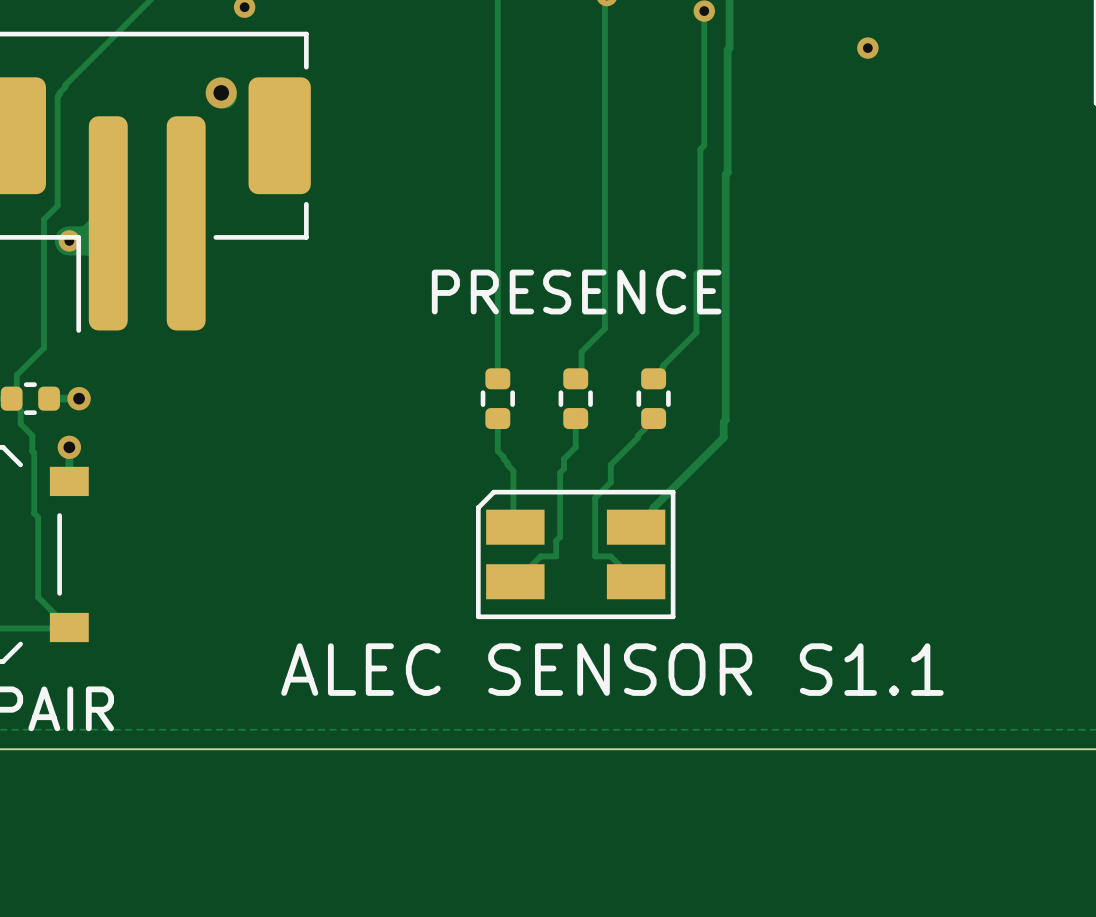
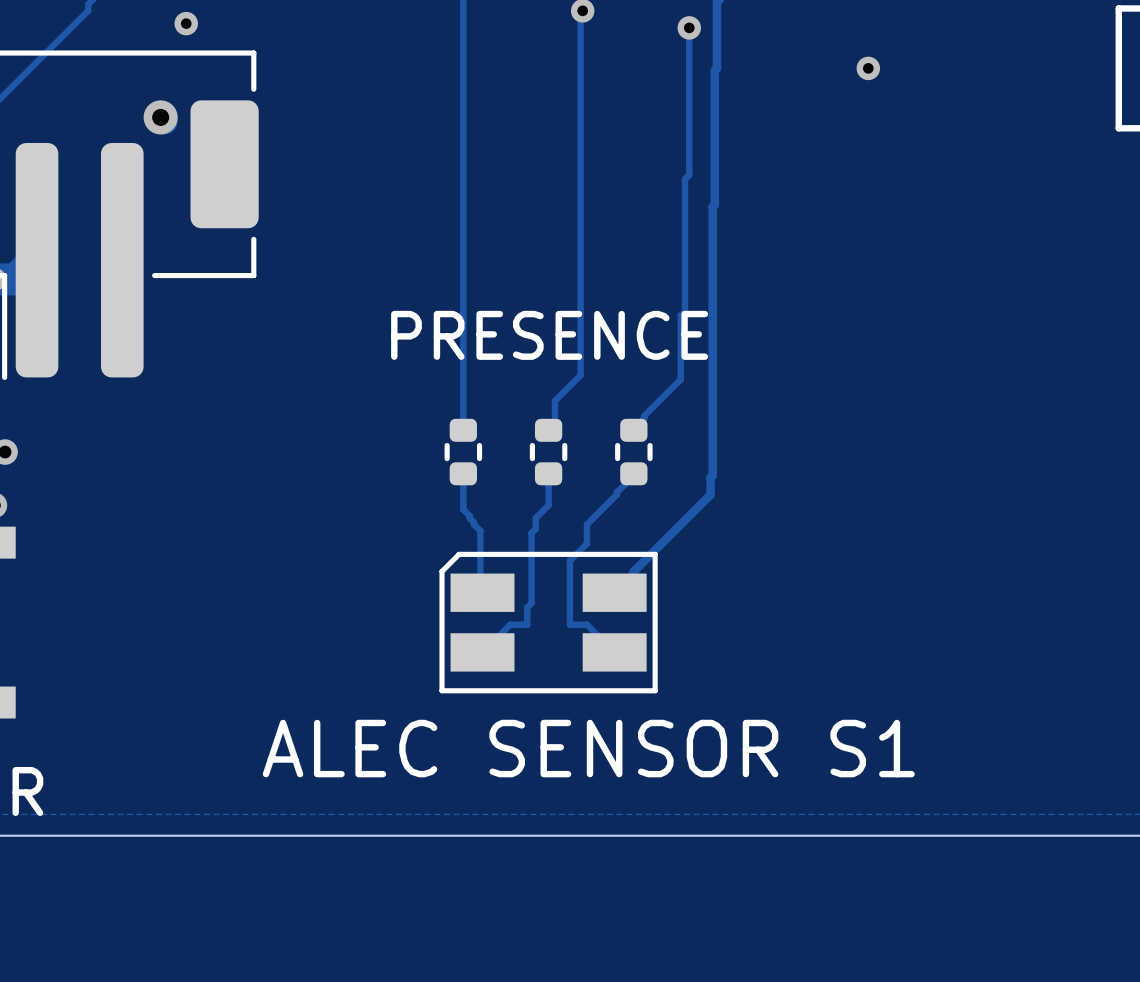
text: ALEC SENSOR S1.1 (612, 669) -> ALEC SENSOR S1 (588, 748)

